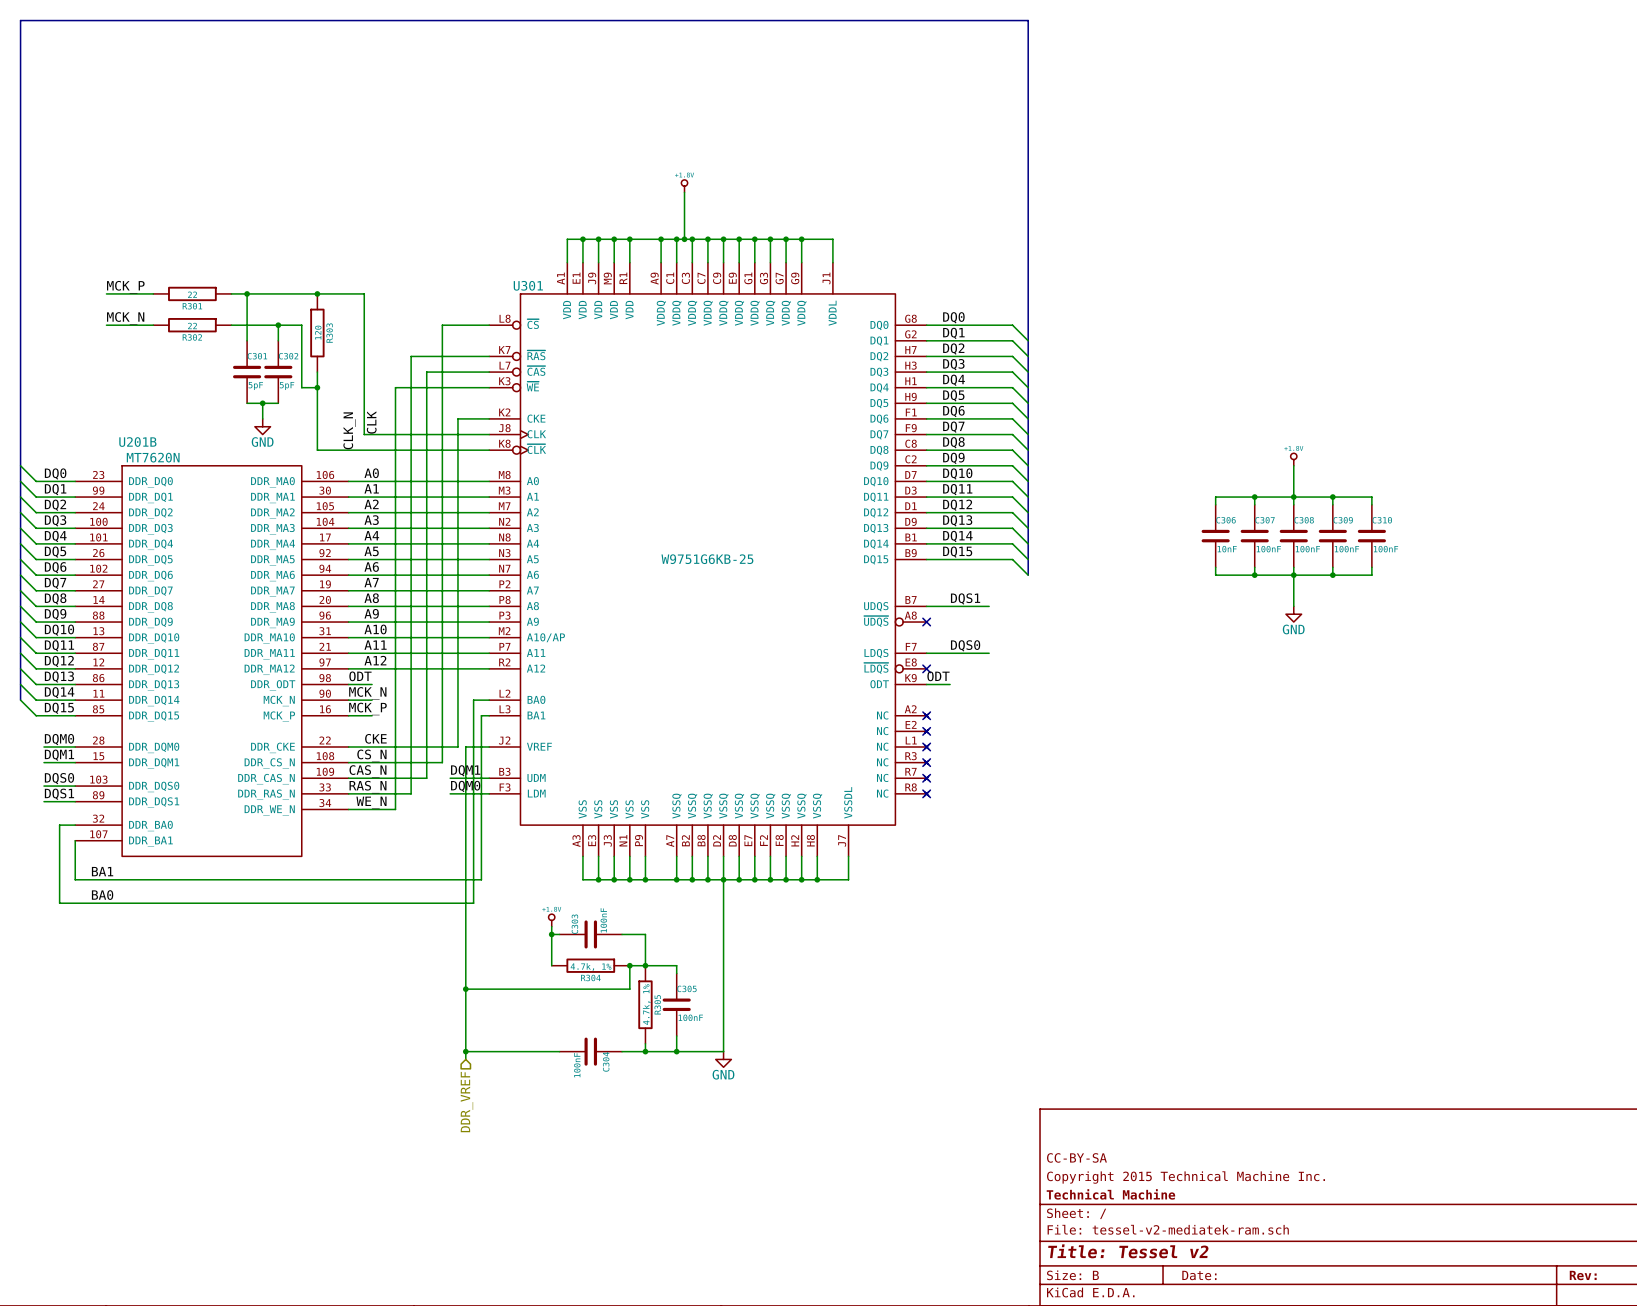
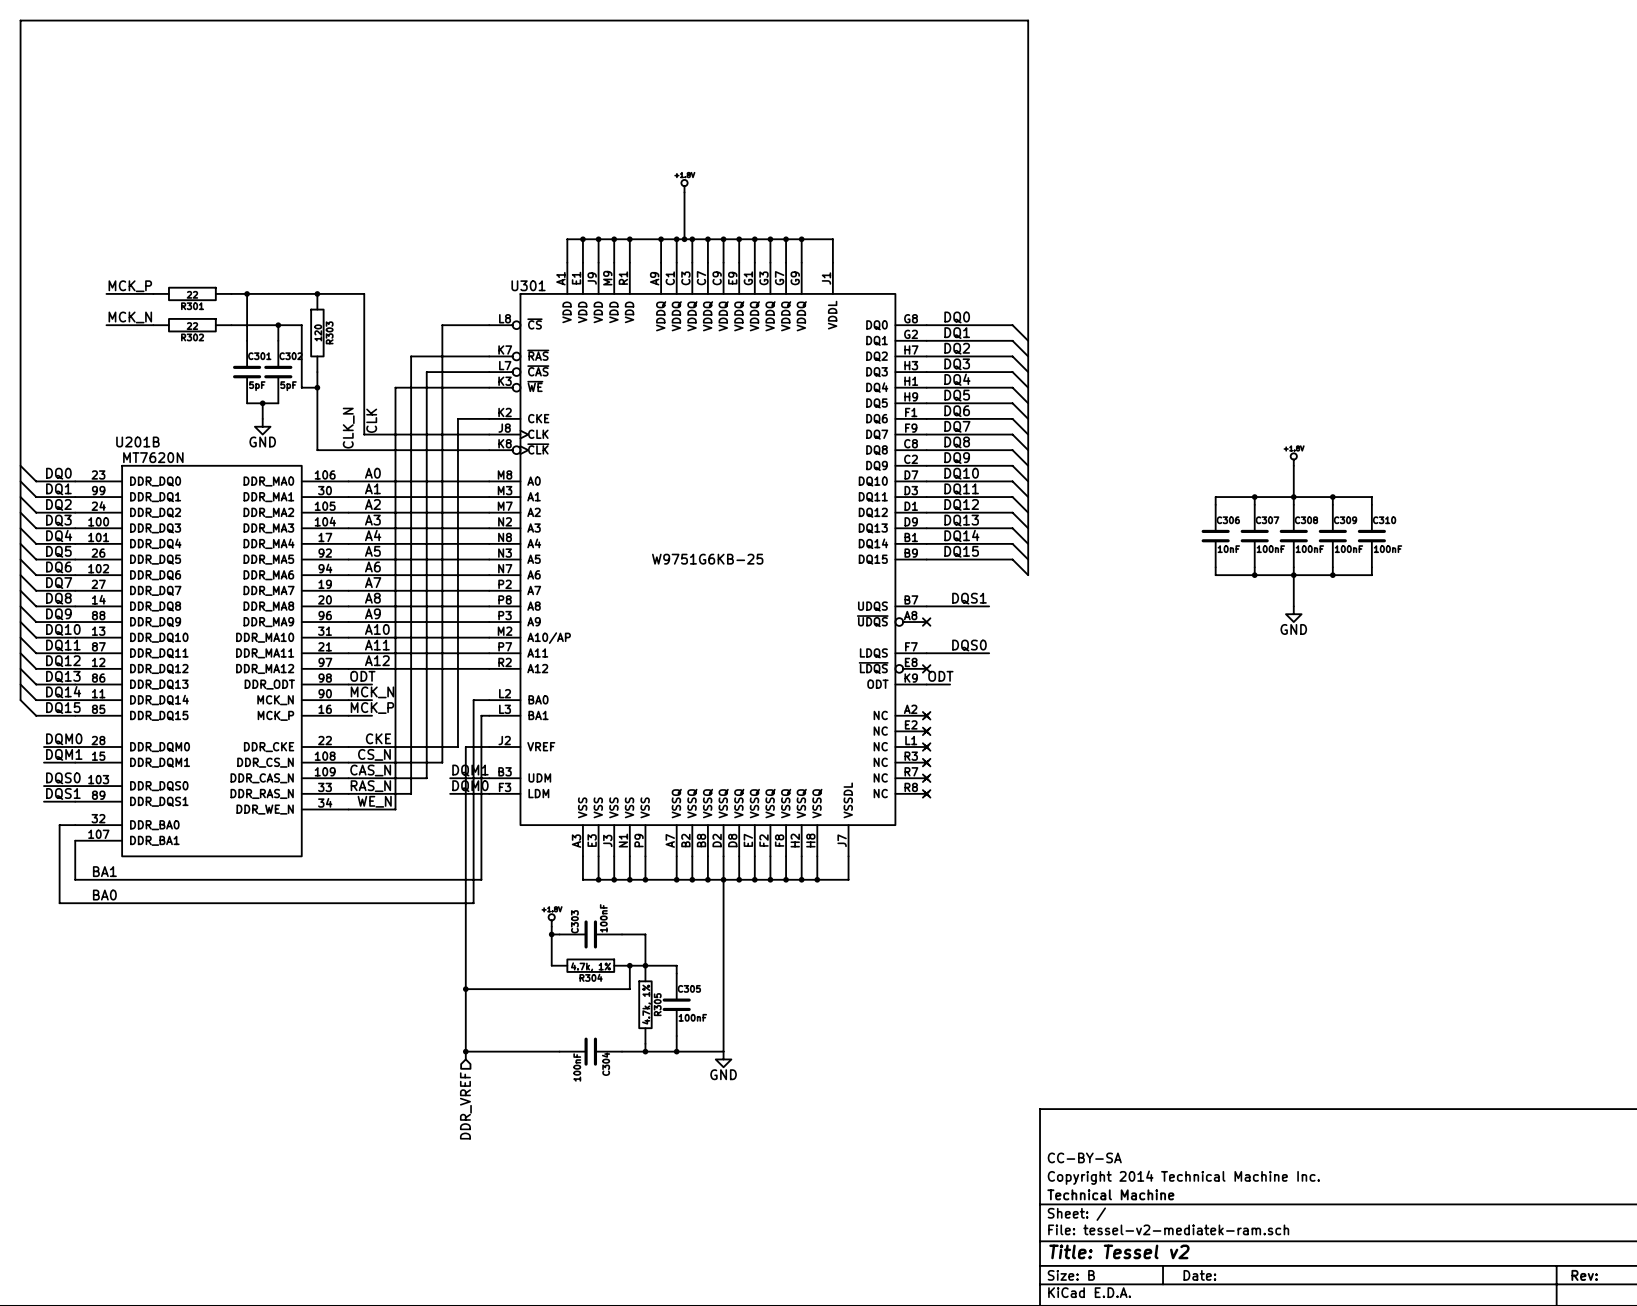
title block: Copyright 2015 Technical Machine Inc. (1186, 1177) -> Copyright 2014 Technical Machine Inc. (1183, 1177)

